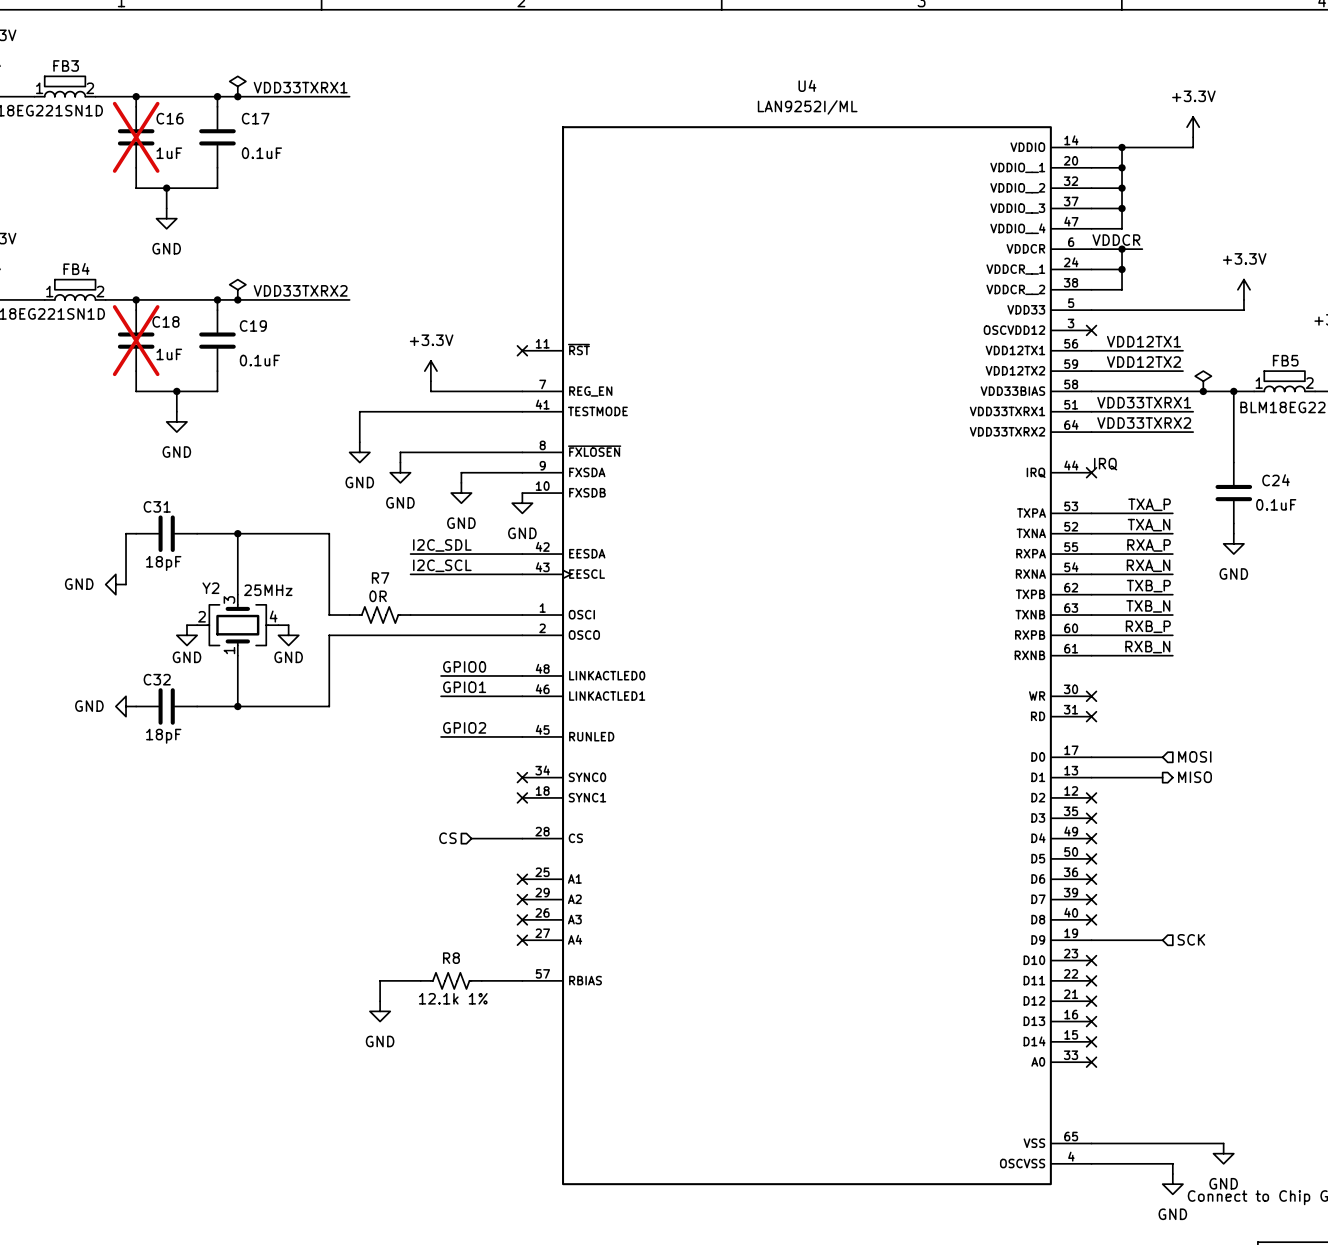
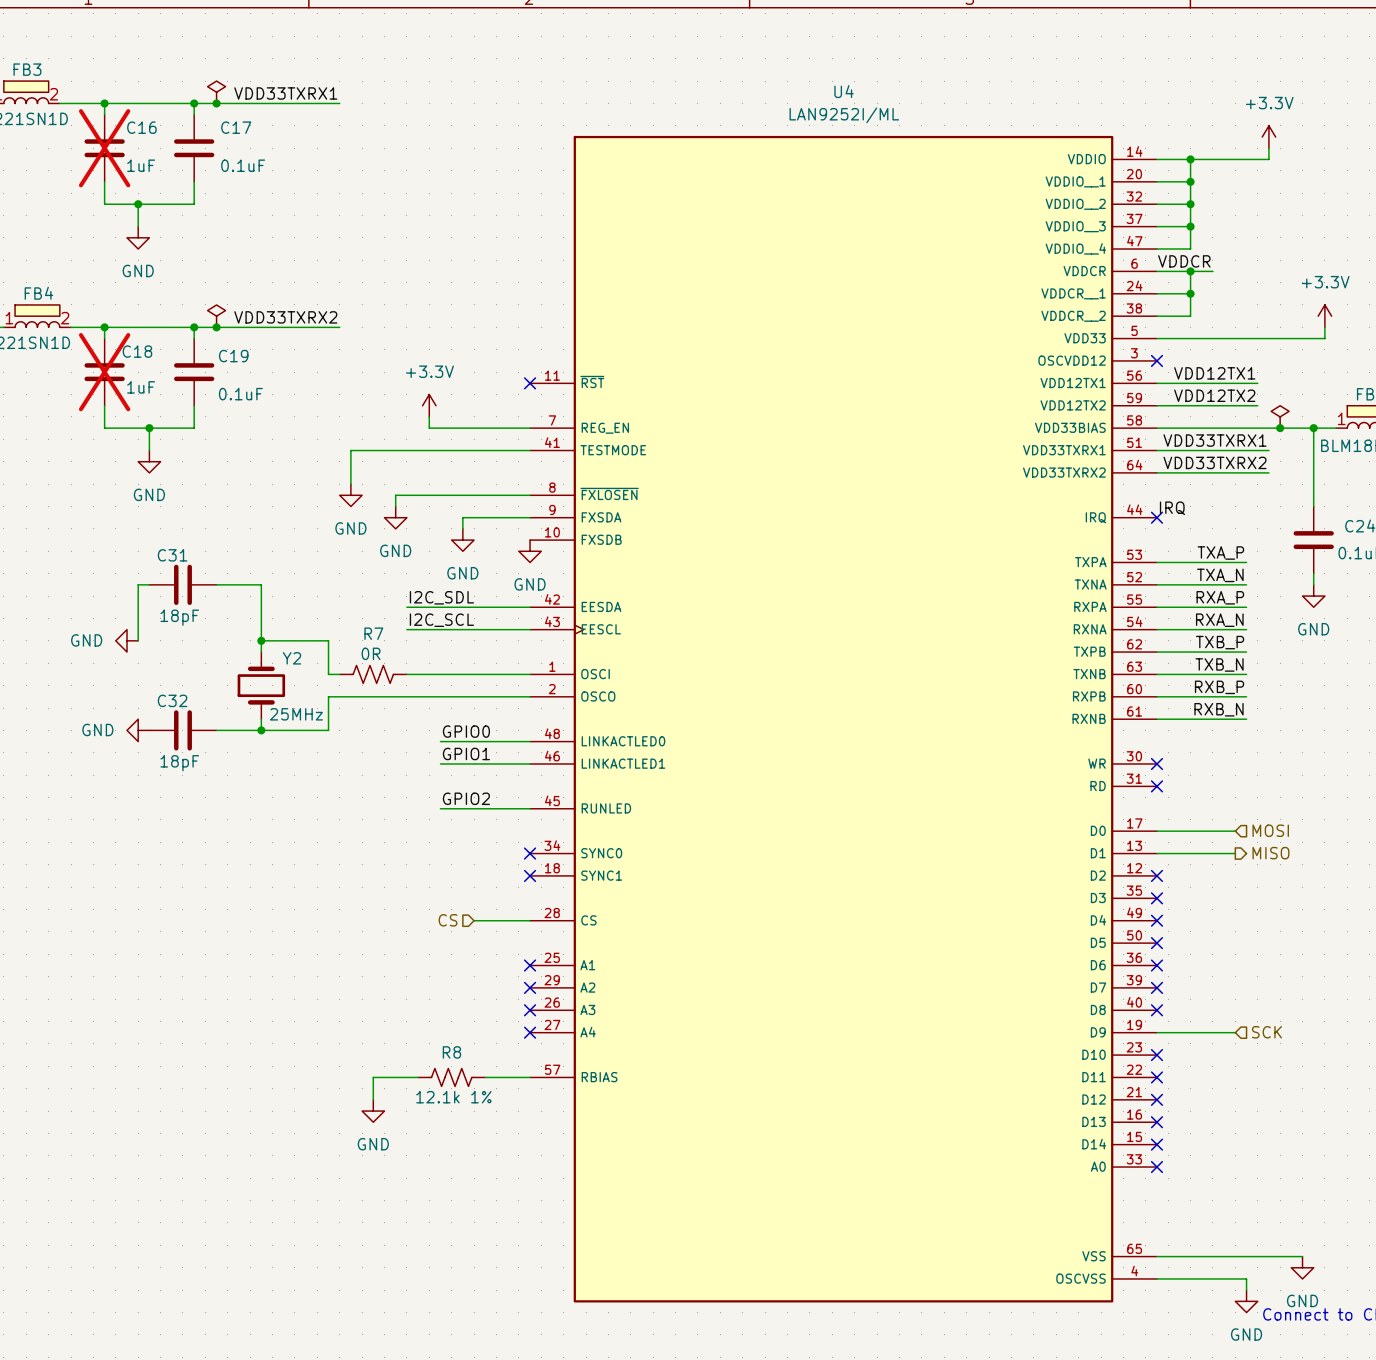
wire: (136, 533) (126, 533) (126, 584) -> (149, 584) (138, 584) (138, 640)
C31 position: (166, 533) -> (182, 584)
wire: (197, 533) (237, 533) (237, 594) -> none
junction: (237, 533) -> none
wire: (278, 533) (329, 533) (329, 615) (339, 615) -> (261, 640) (328, 640) (328, 674)
wire: none -> (261, 584) (261, 652)
power symbol: GND (115, 584) -> none
power symbol: none -> GND (127, 640)
junction: none -> (261, 640)
Y2 name position: Y2 (210, 588) -> Y2 (291, 658)
Y2 value position: 25MHz (268, 590) -> 25MHz (296, 714)
Y2 symbol: [197, 594, 279, 656] -> [237, 652, 286, 720]
wire: (186, 625) (197, 625) -> none
wire: (278, 625) (288, 625) -> none
power symbol: GND (186, 635) -> none
power symbol: GND (288, 635) -> none
wire: (339, 635) (329, 635) (329, 706) (197, 706) -> (328, 696) (328, 730) (216, 730)
wire: (237, 655) (237, 706) -> none
wire: none -> (261, 719) (261, 730)
power symbol: none -> GND (138, 730)
junction: none -> (261, 730)
power symbol: GND (126, 706) -> none
C32 position: (166, 706) -> (182, 730)
junction: (237, 706) -> none

